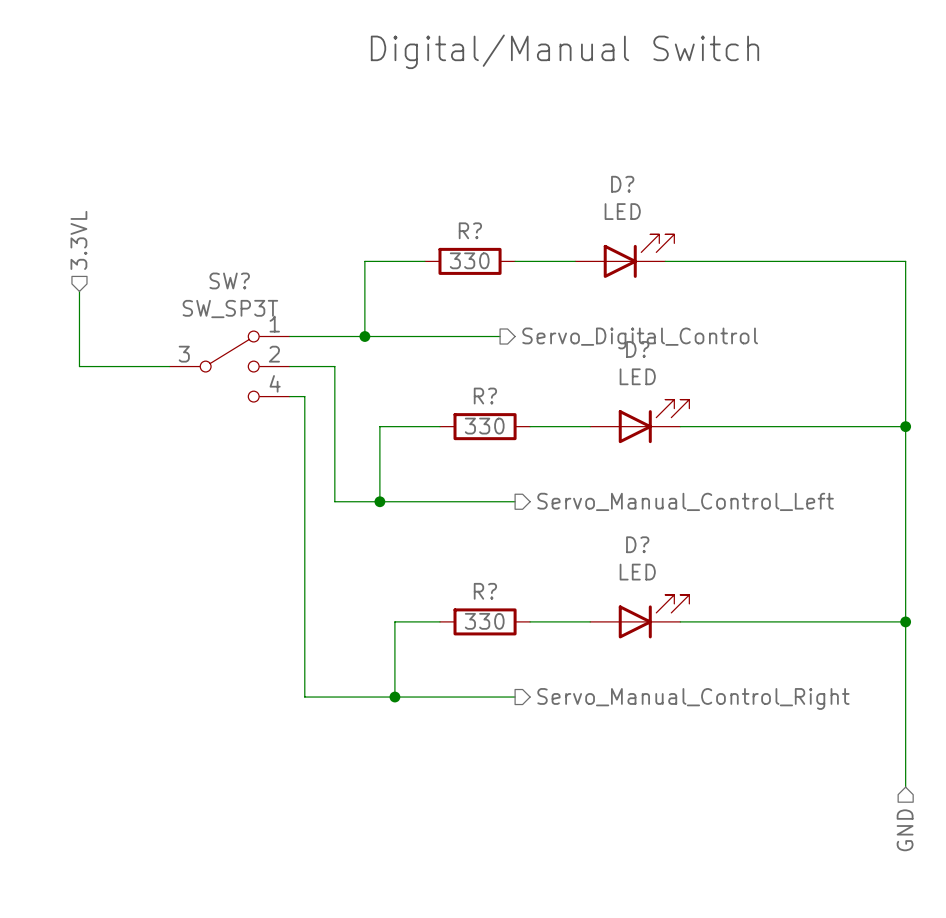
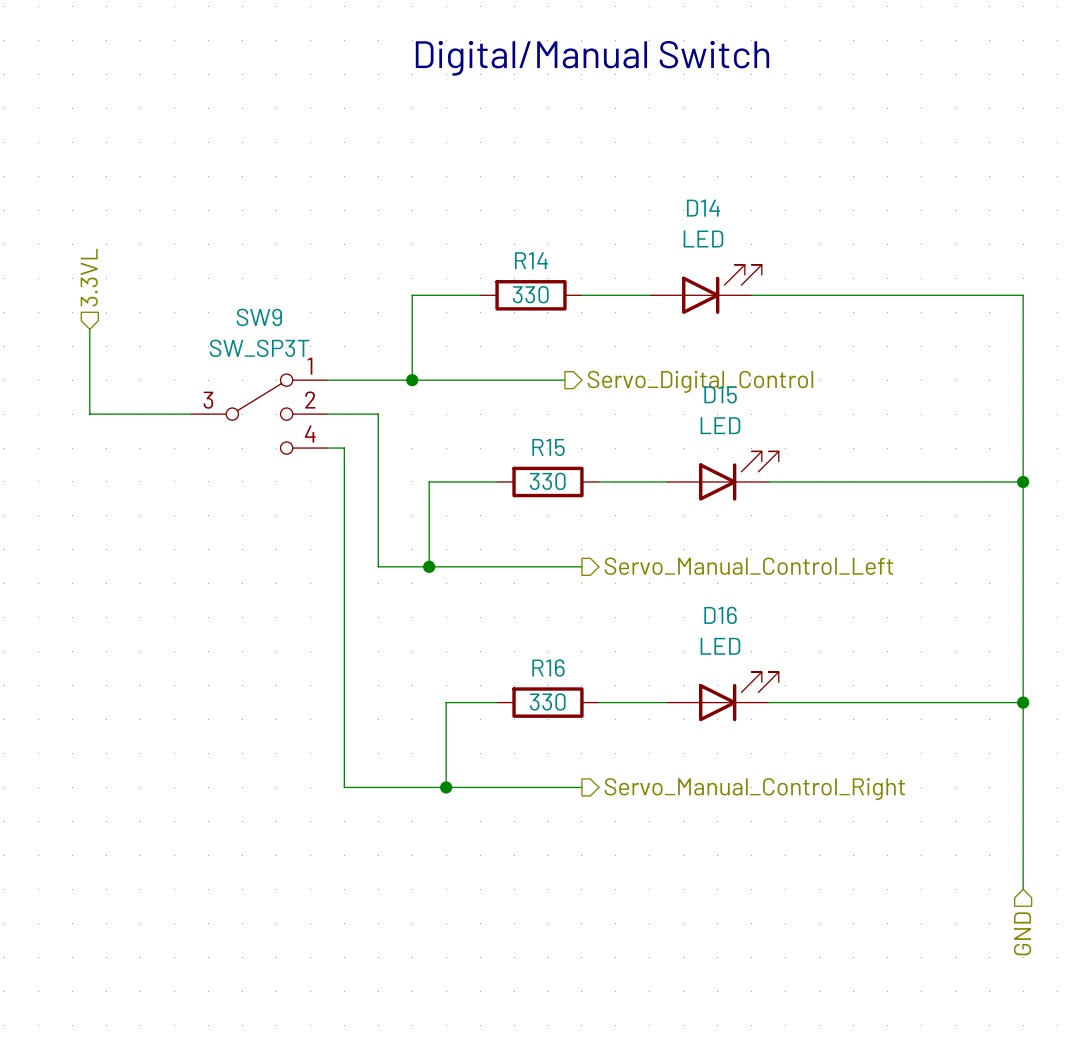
D? name: D? (622, 184) -> D14 (703, 208)
R? name: R? (470, 230) -> R14 (531, 260)
SW? name: SW? (229, 280) -> SW9 (259, 317)
D? name: D? (637, 349) -> D15 (720, 394)
R? name: R? (485, 396) -> R15 (548, 447)
D? name: D? (637, 544) -> D16 (720, 615)
R? name: R? (485, 591) -> R16 (548, 668)

